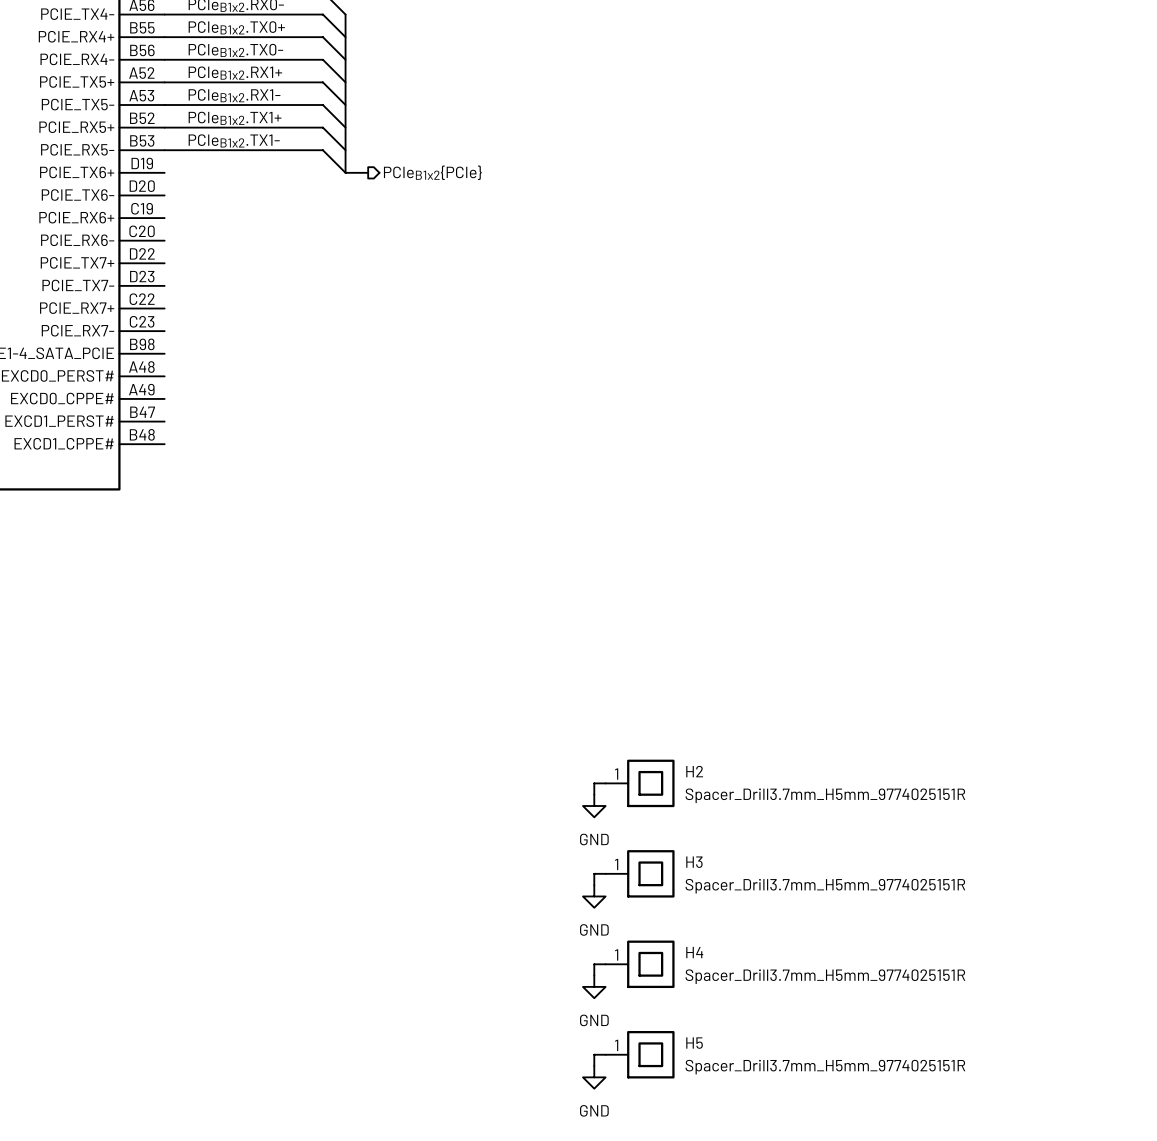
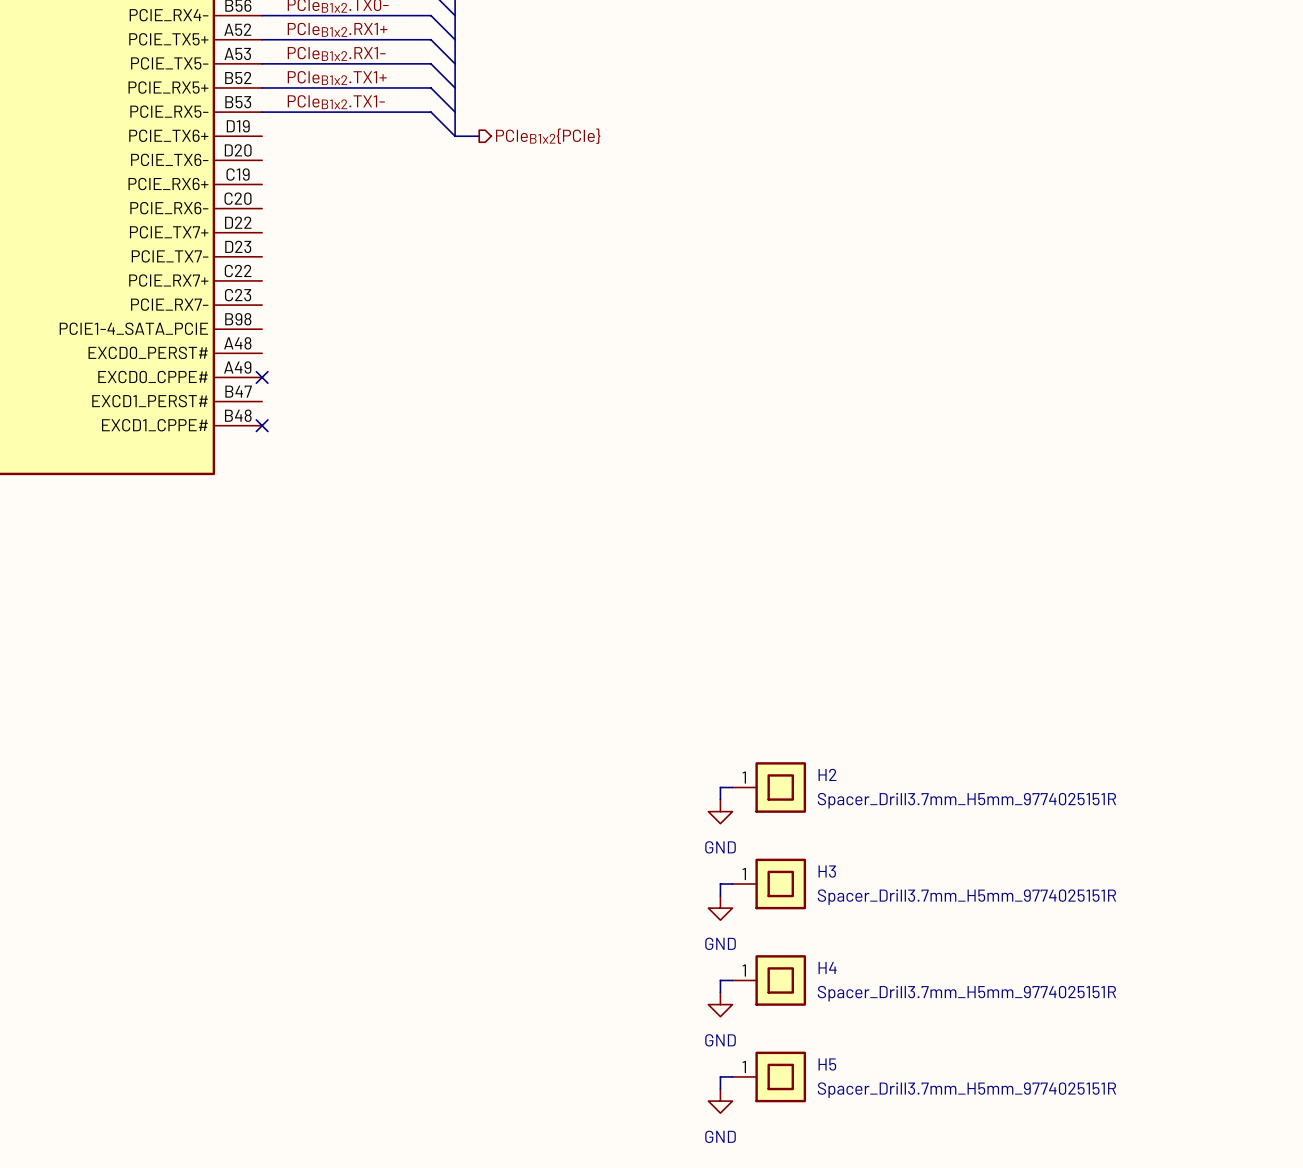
no-connect mark: none -> (262, 377)
no-connect mark: none -> (262, 425)

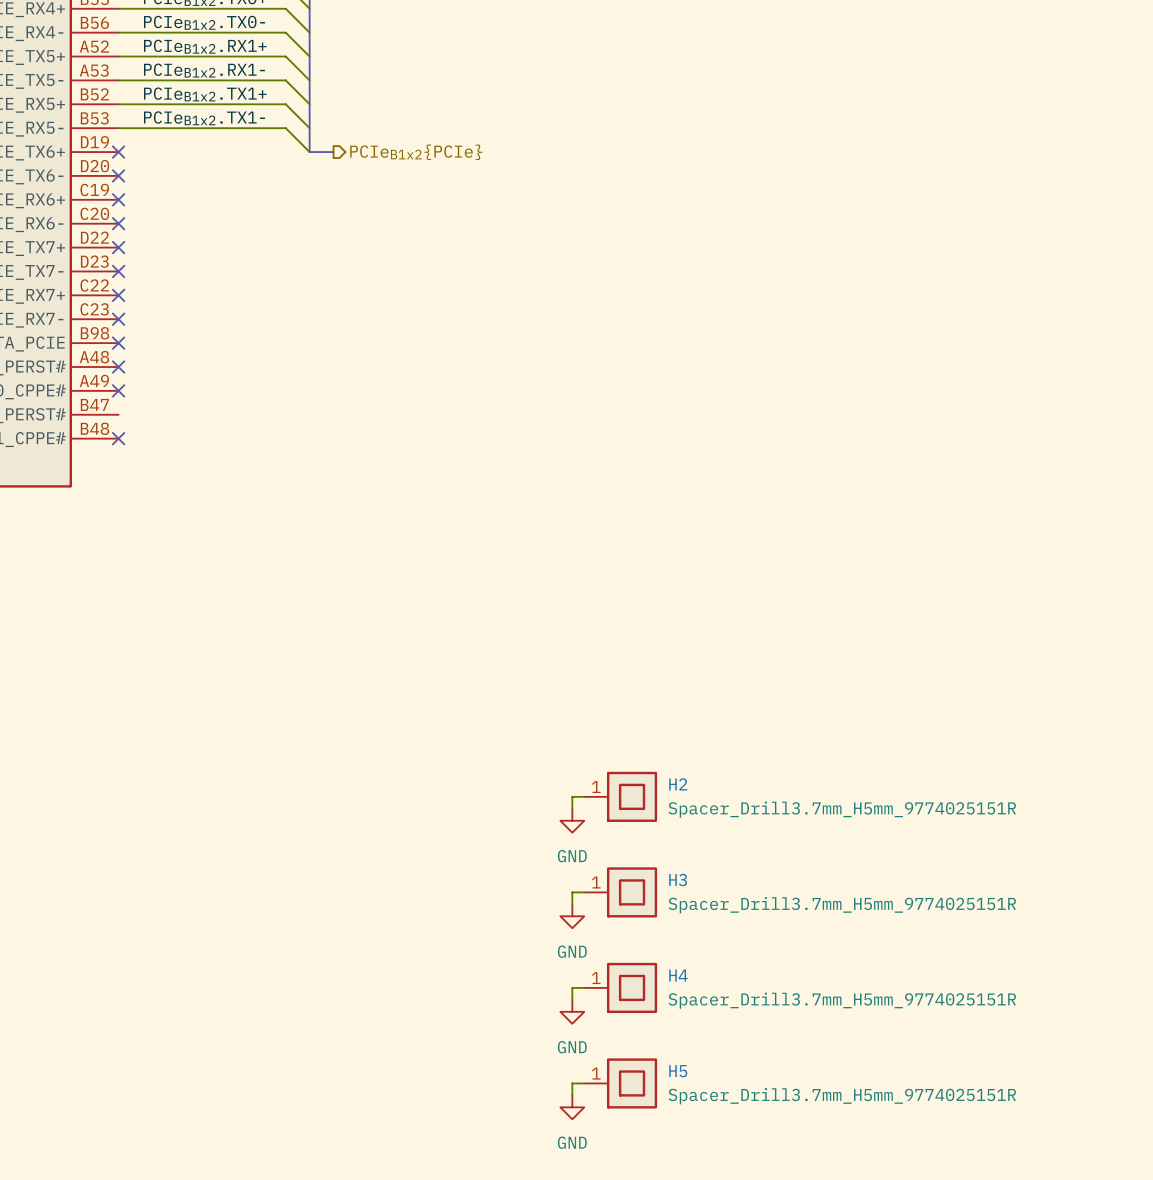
no-connect mark: none -> (118, 152)
no-connect mark: none -> (118, 175)
no-connect mark: none -> (118, 199)
no-connect mark: none -> (118, 223)
no-connect mark: none -> (118, 247)
no-connect mark: none -> (118, 271)
no-connect mark: none -> (118, 295)
no-connect mark: none -> (118, 319)
no-connect mark: none -> (118, 343)
no-connect mark: none -> (118, 367)

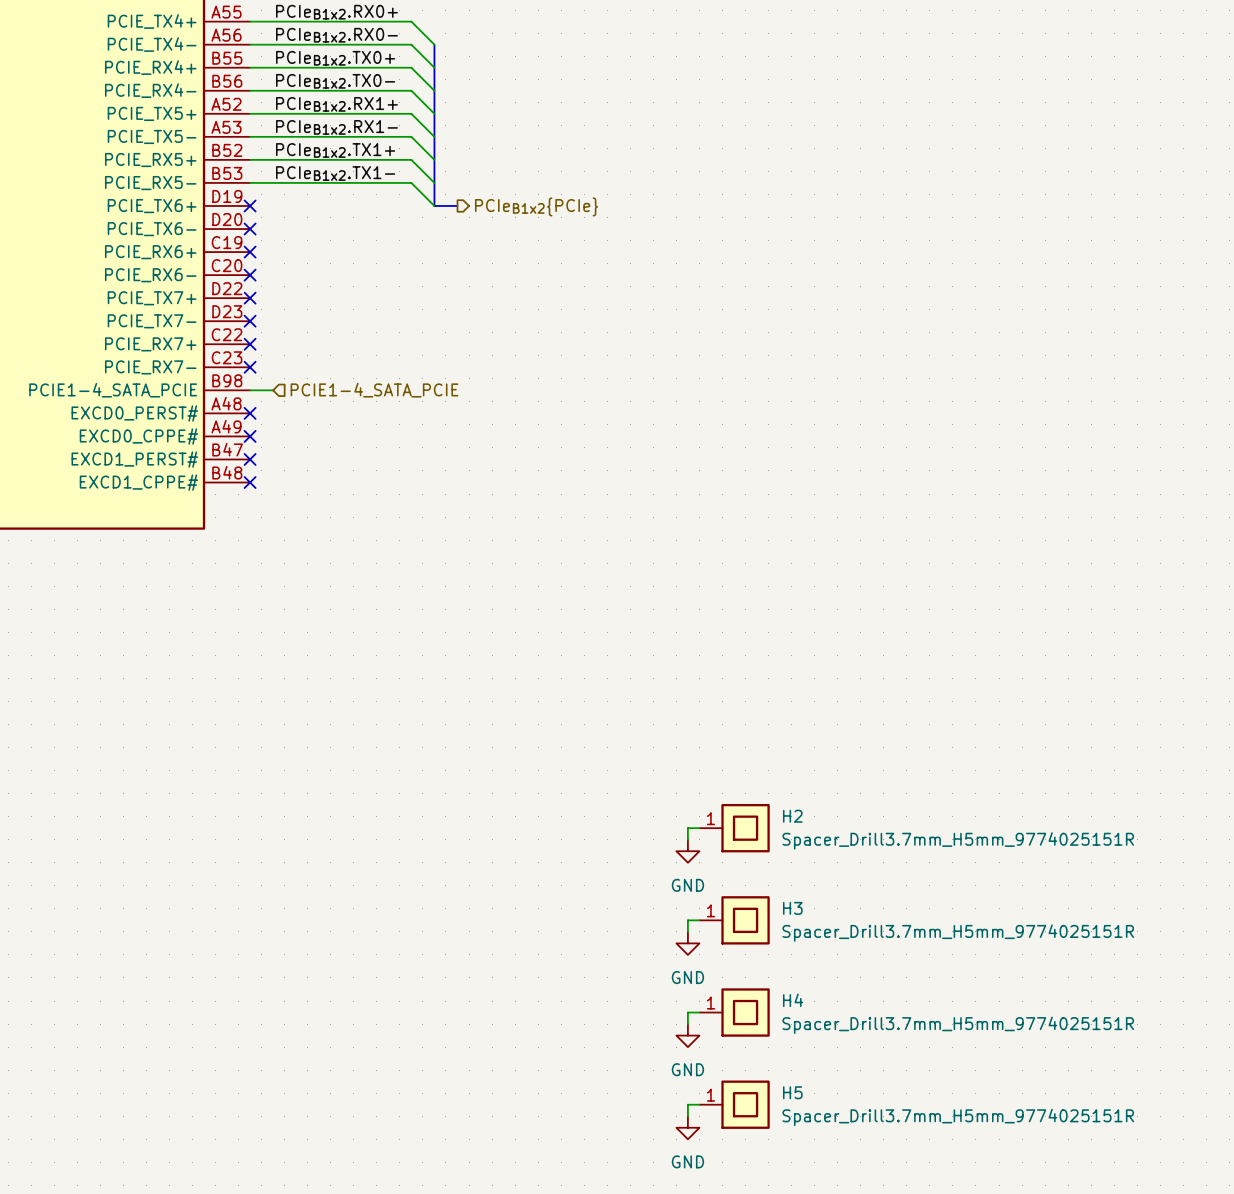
wire: none -> (250, 390) (273, 390)
no-connect mark: (118, 343) -> none
hierarchical label: none -> PCIE1-4_SATA_PCIE (374, 390)
no-connect mark: none -> (250, 459)

